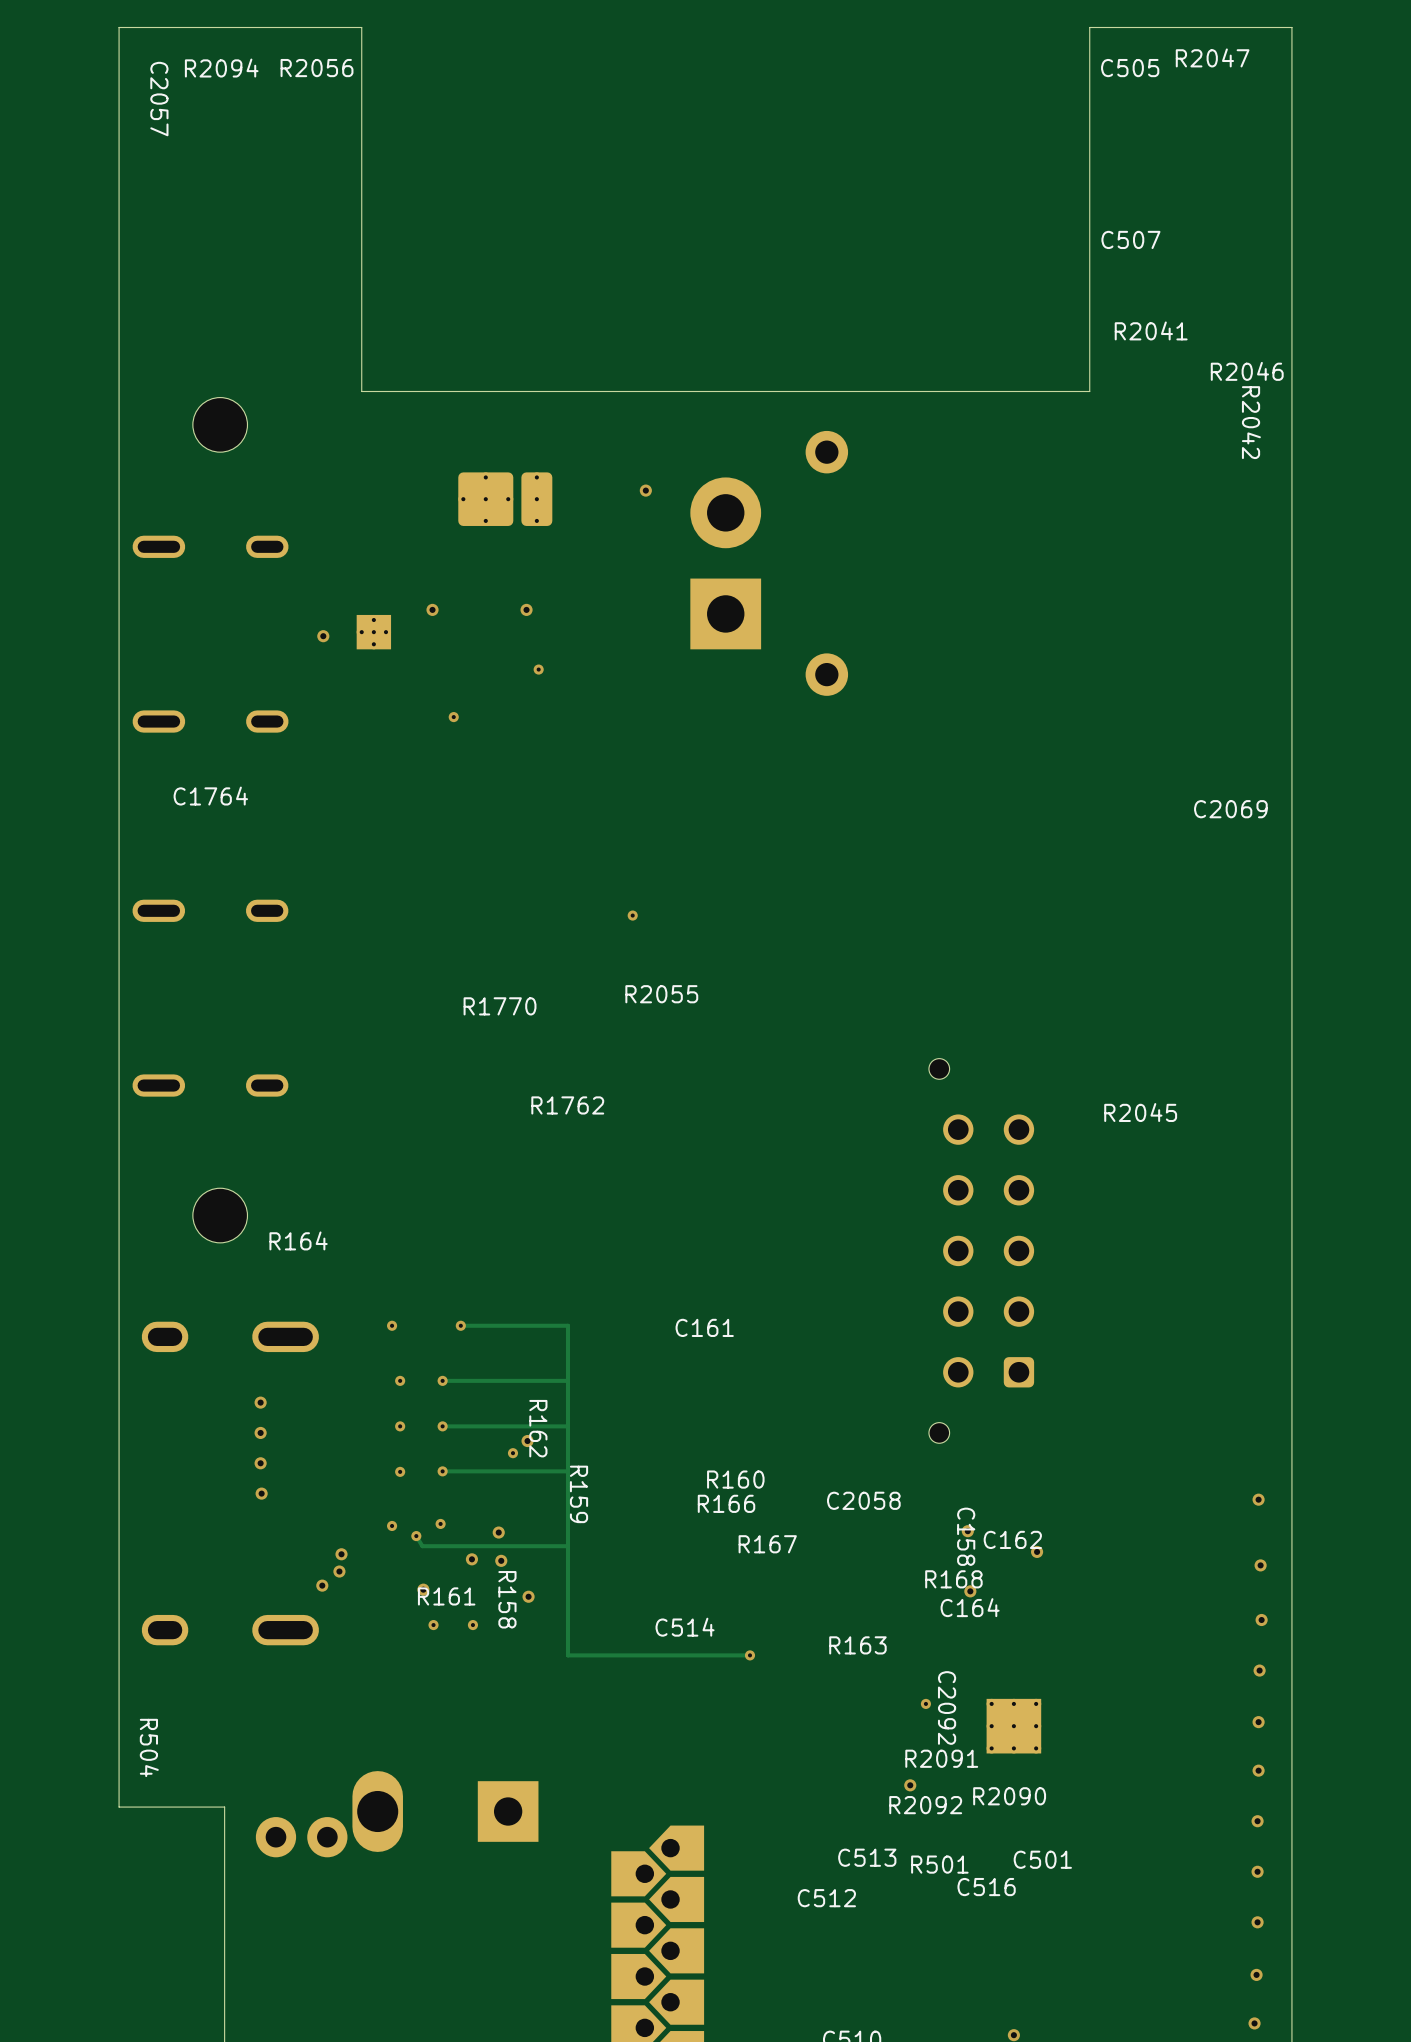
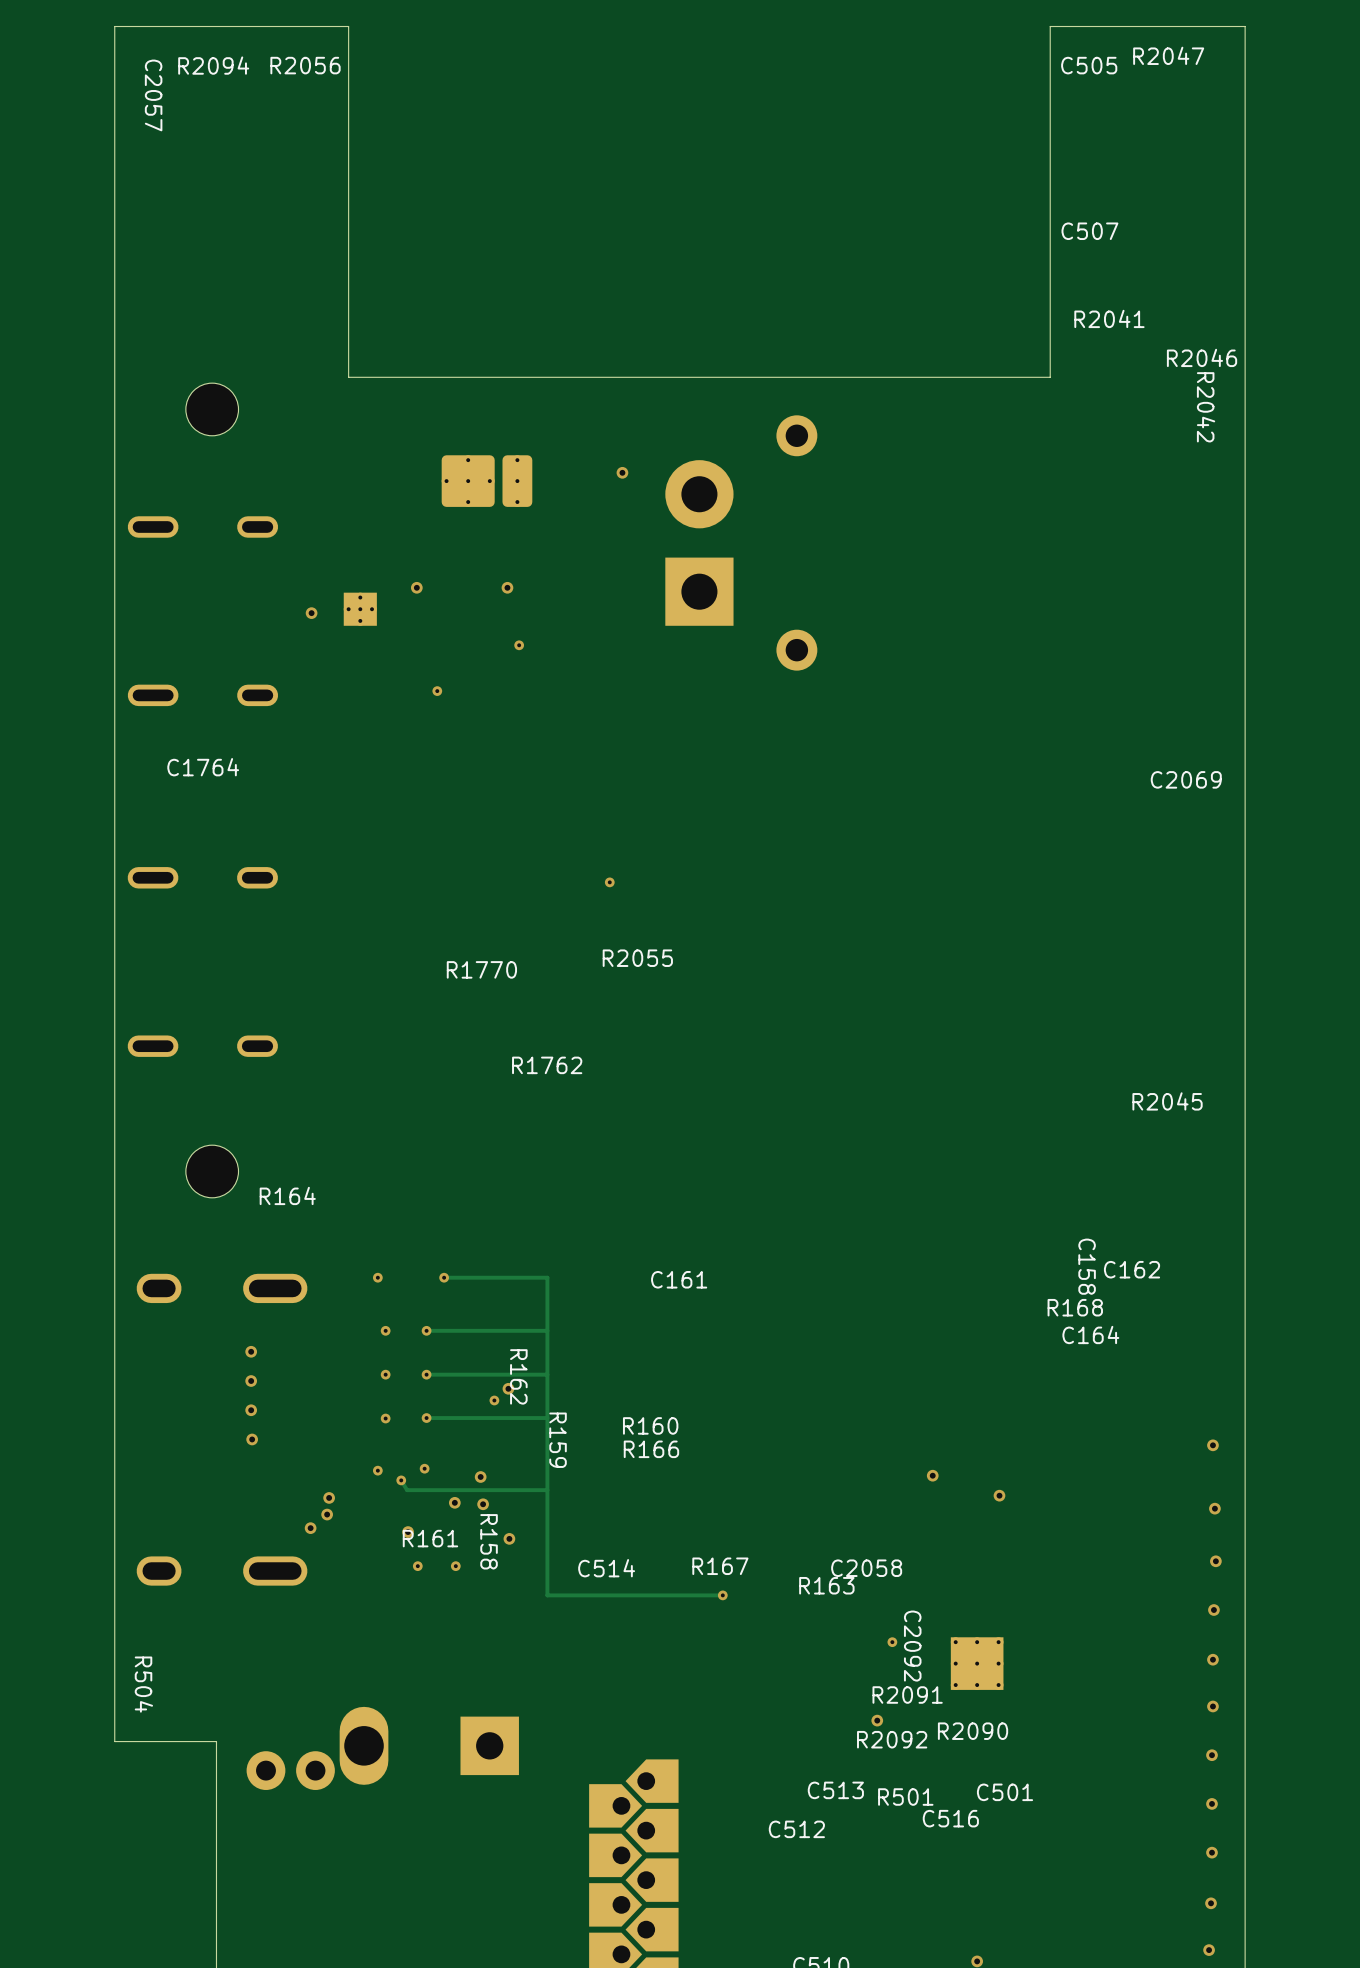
R2045 position: (1140, 1112) -> (1167, 1101)
part: (981, 1250) -> none
R160 position: (735, 1479) -> (650, 1425)
C2058 position: (863, 1500) -> (866, 1568)
R166 position: (726, 1503) -> (651, 1449)
C158 position: (966, 1536) -> (1087, 1266)
C162 position: (1012, 1539) -> (1132, 1269)
R167 position: (767, 1544) -> (720, 1566)
R168 position: (953, 1579) -> (1075, 1307)
via: (970, 1591) -> none
C164 position: (970, 1607) -> (1090, 1334)
C514 position: (685, 1627) -> (606, 1568)

